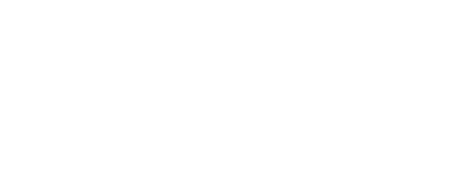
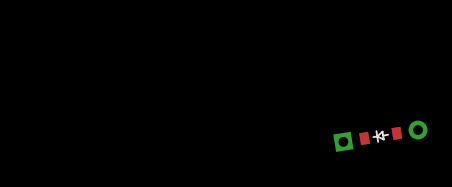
part: none -> (380, 136)

